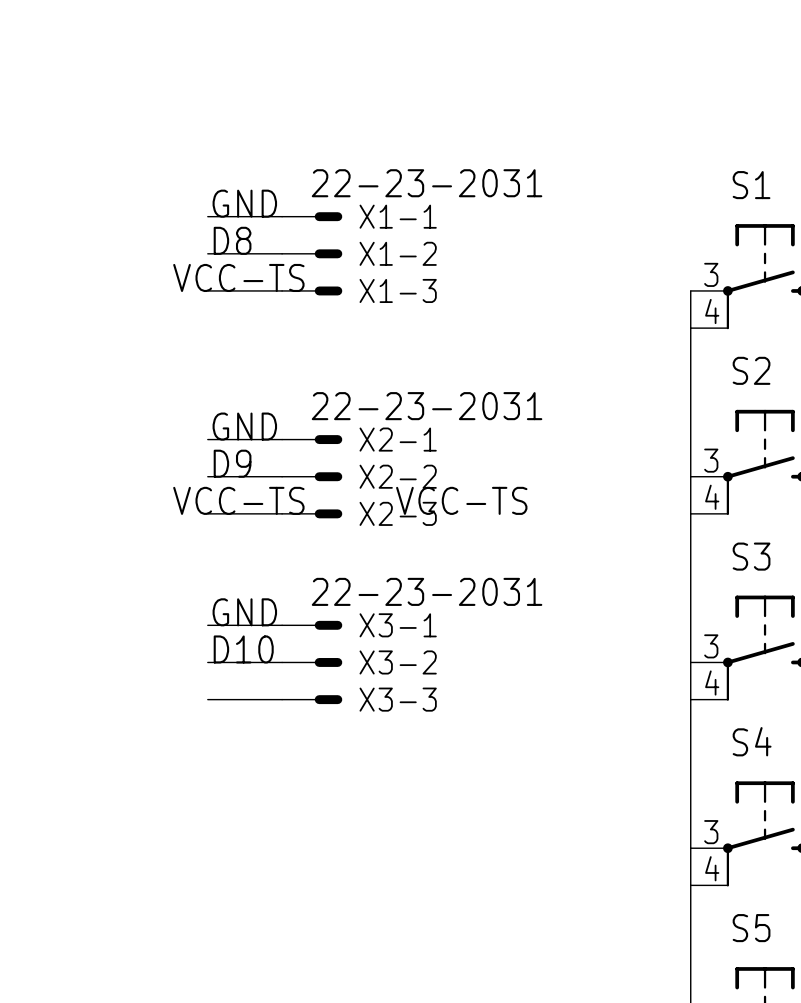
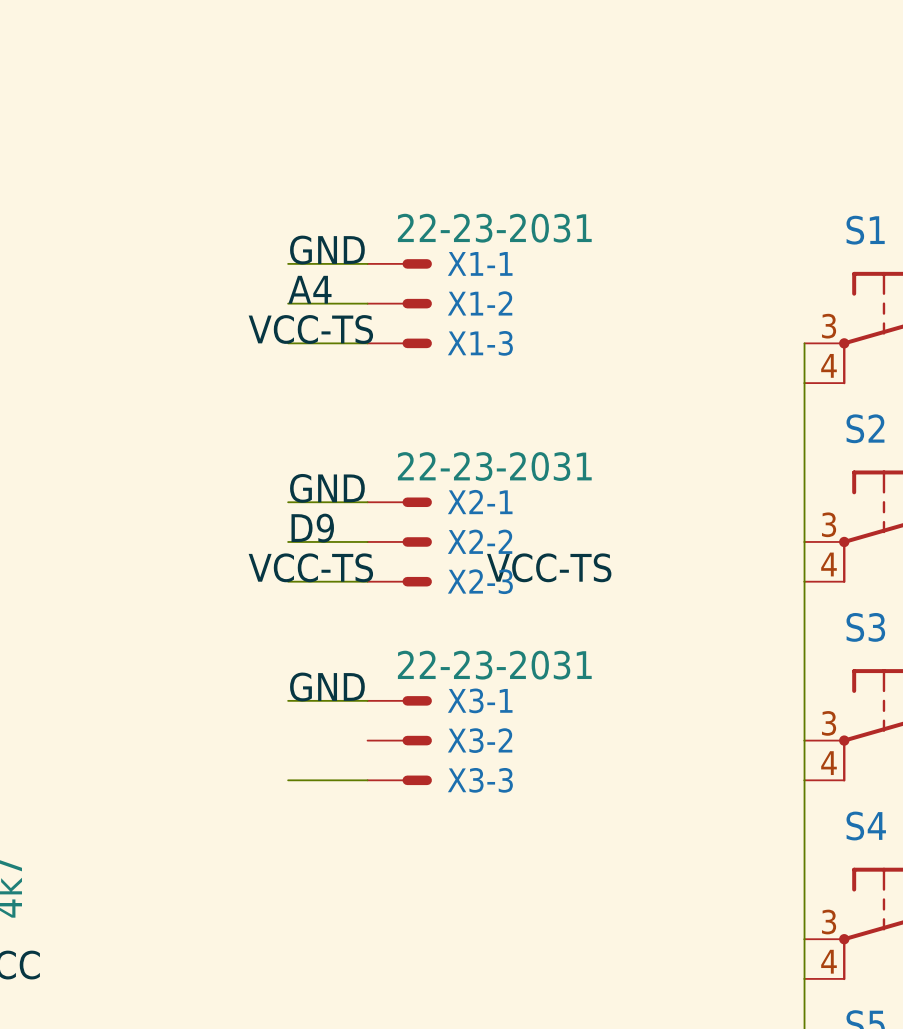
label: D8 (232, 240) -> A4 (309, 289)
label: D10 (243, 649) -> none
wire: (207, 662) (282, 662) -> none

